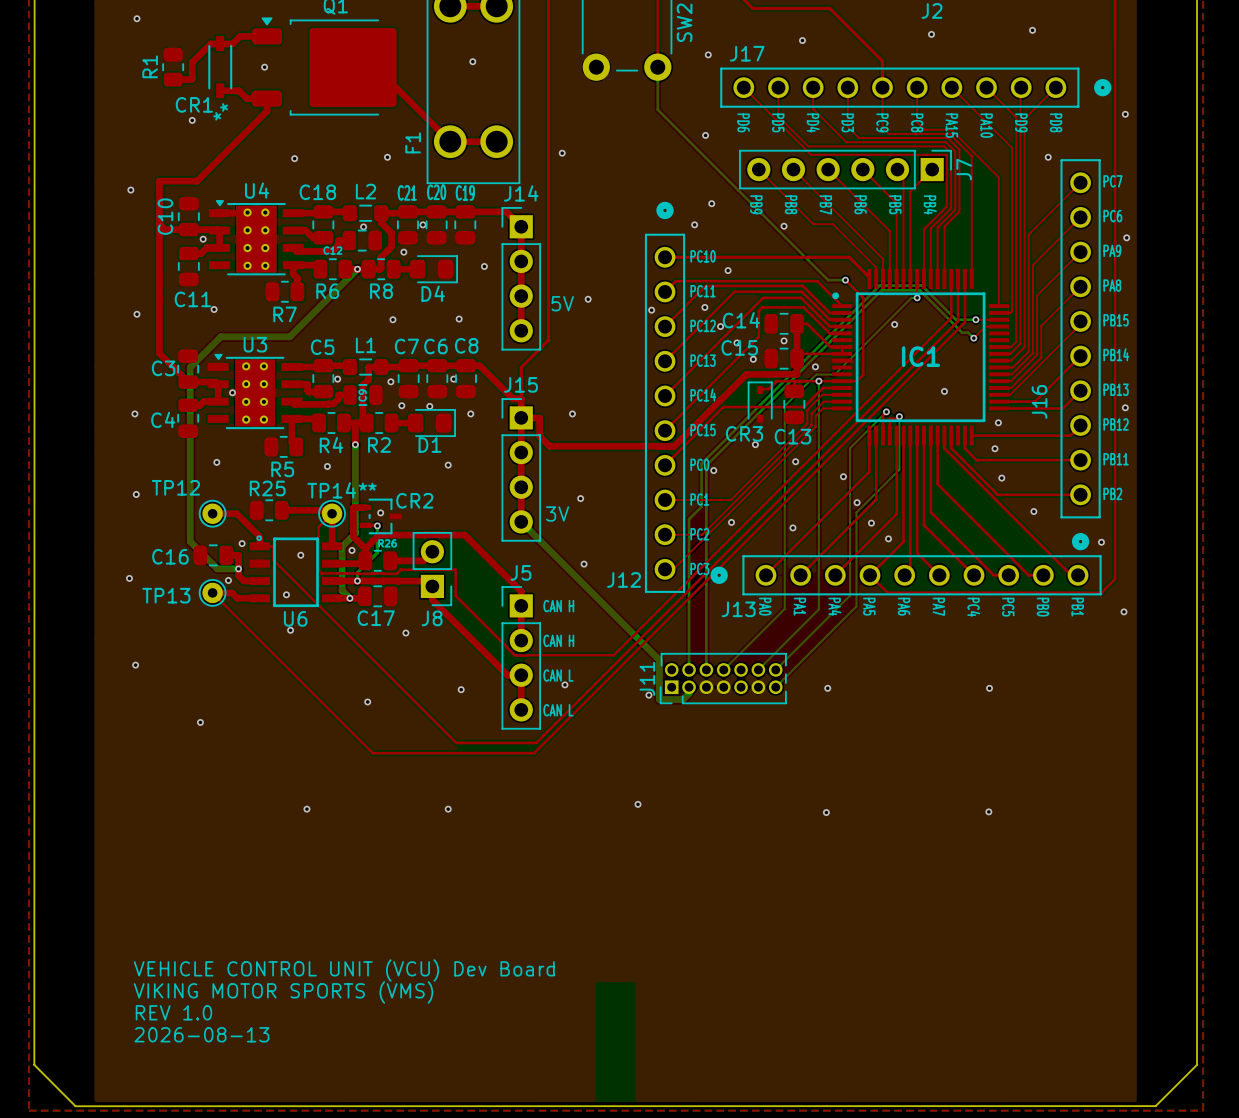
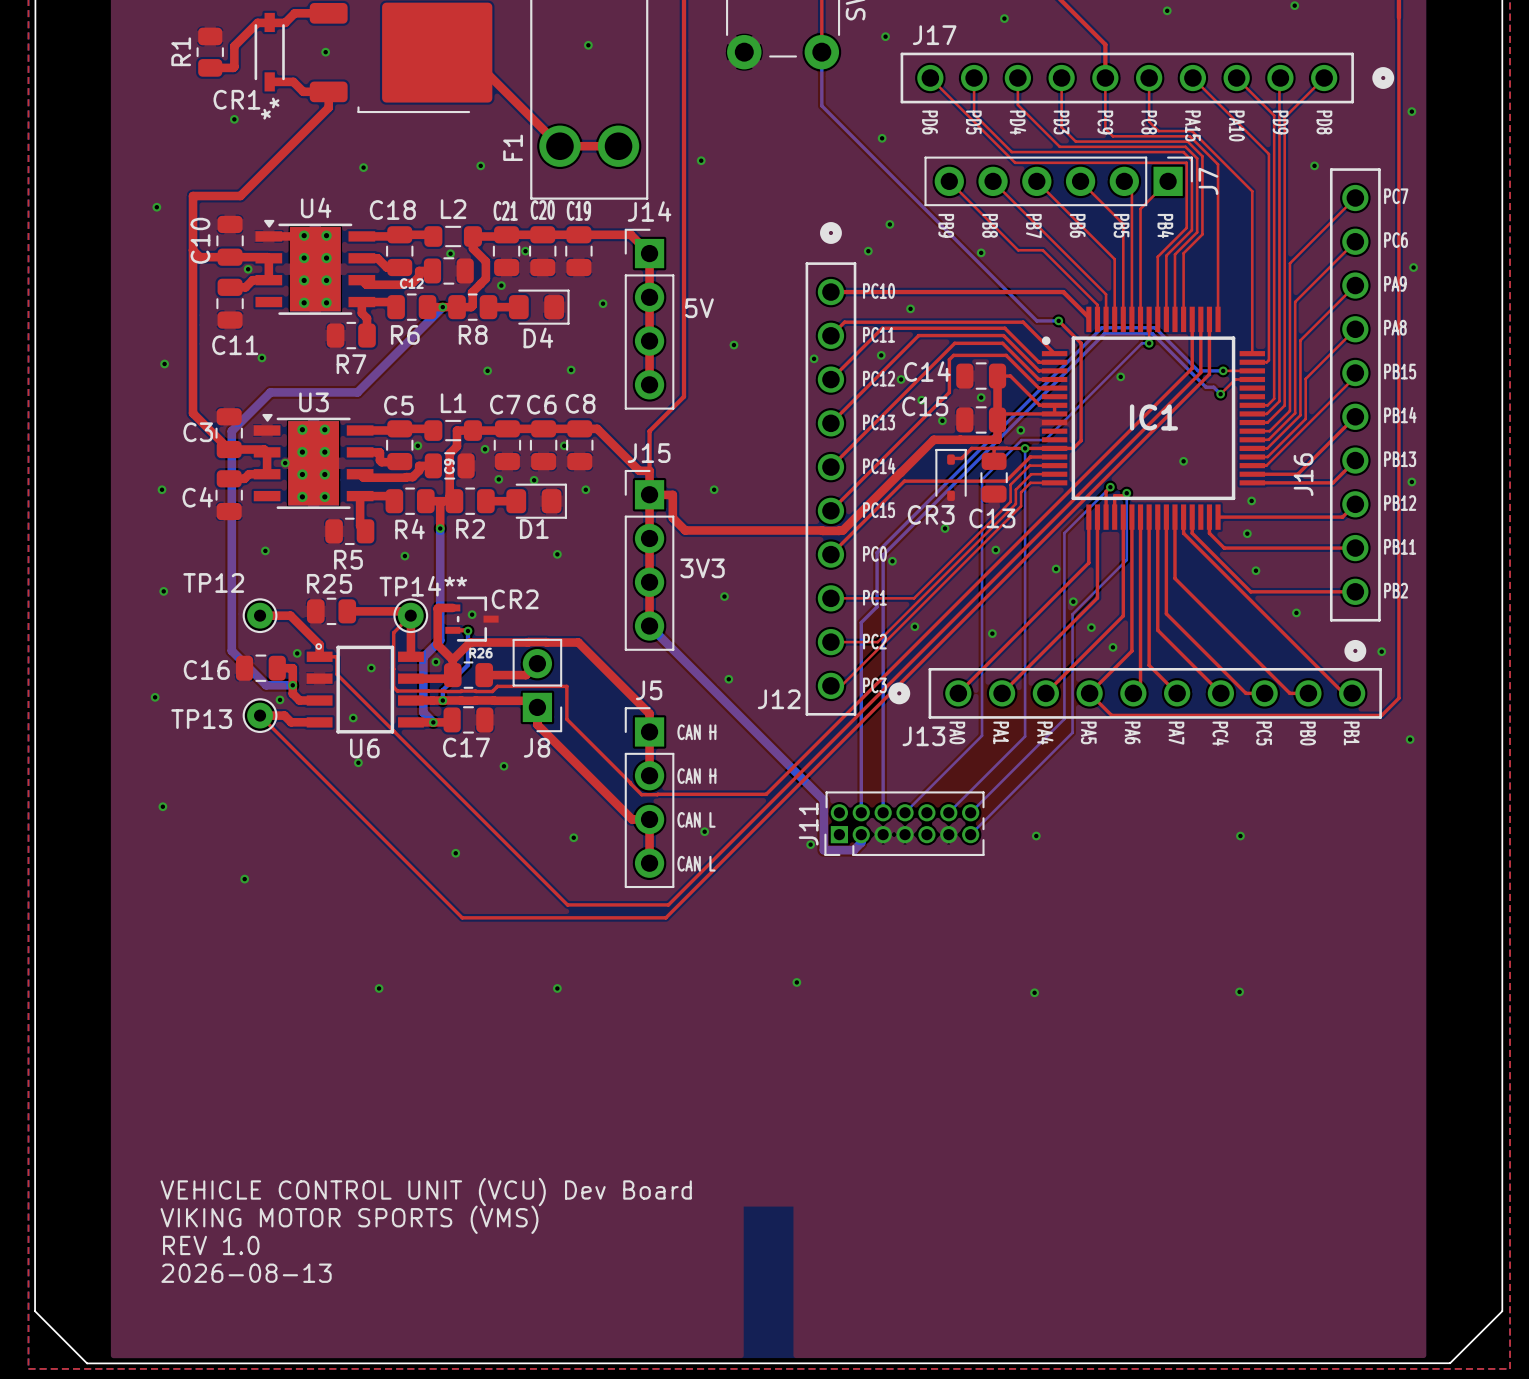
J14 value: none -> 5V (699, 308)
text: 5V (562, 303) -> none
J15 value: none -> 3V3 (702, 568)
text: 3V (557, 513) -> none

